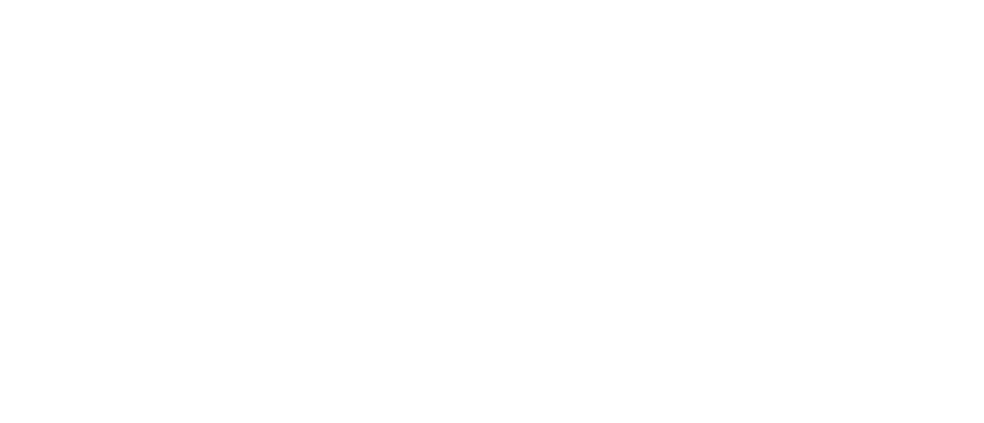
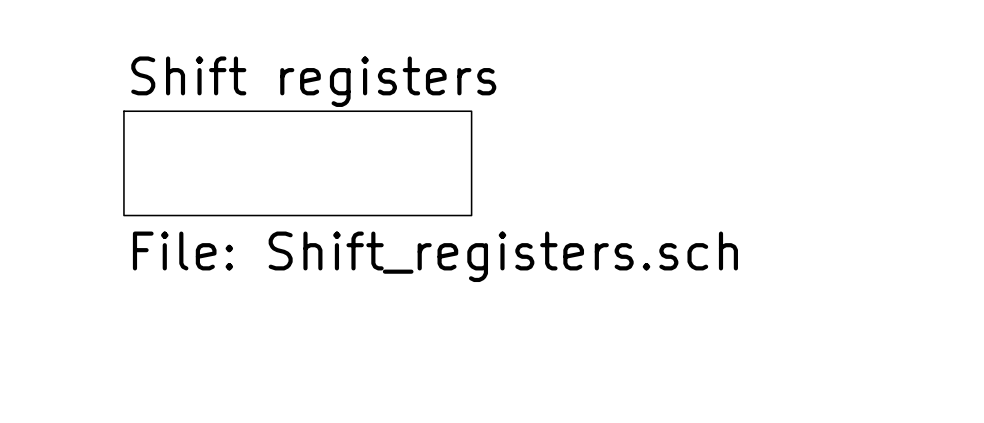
sheet Shift registers: none -> File: Shift_registers.sch (297, 163)

